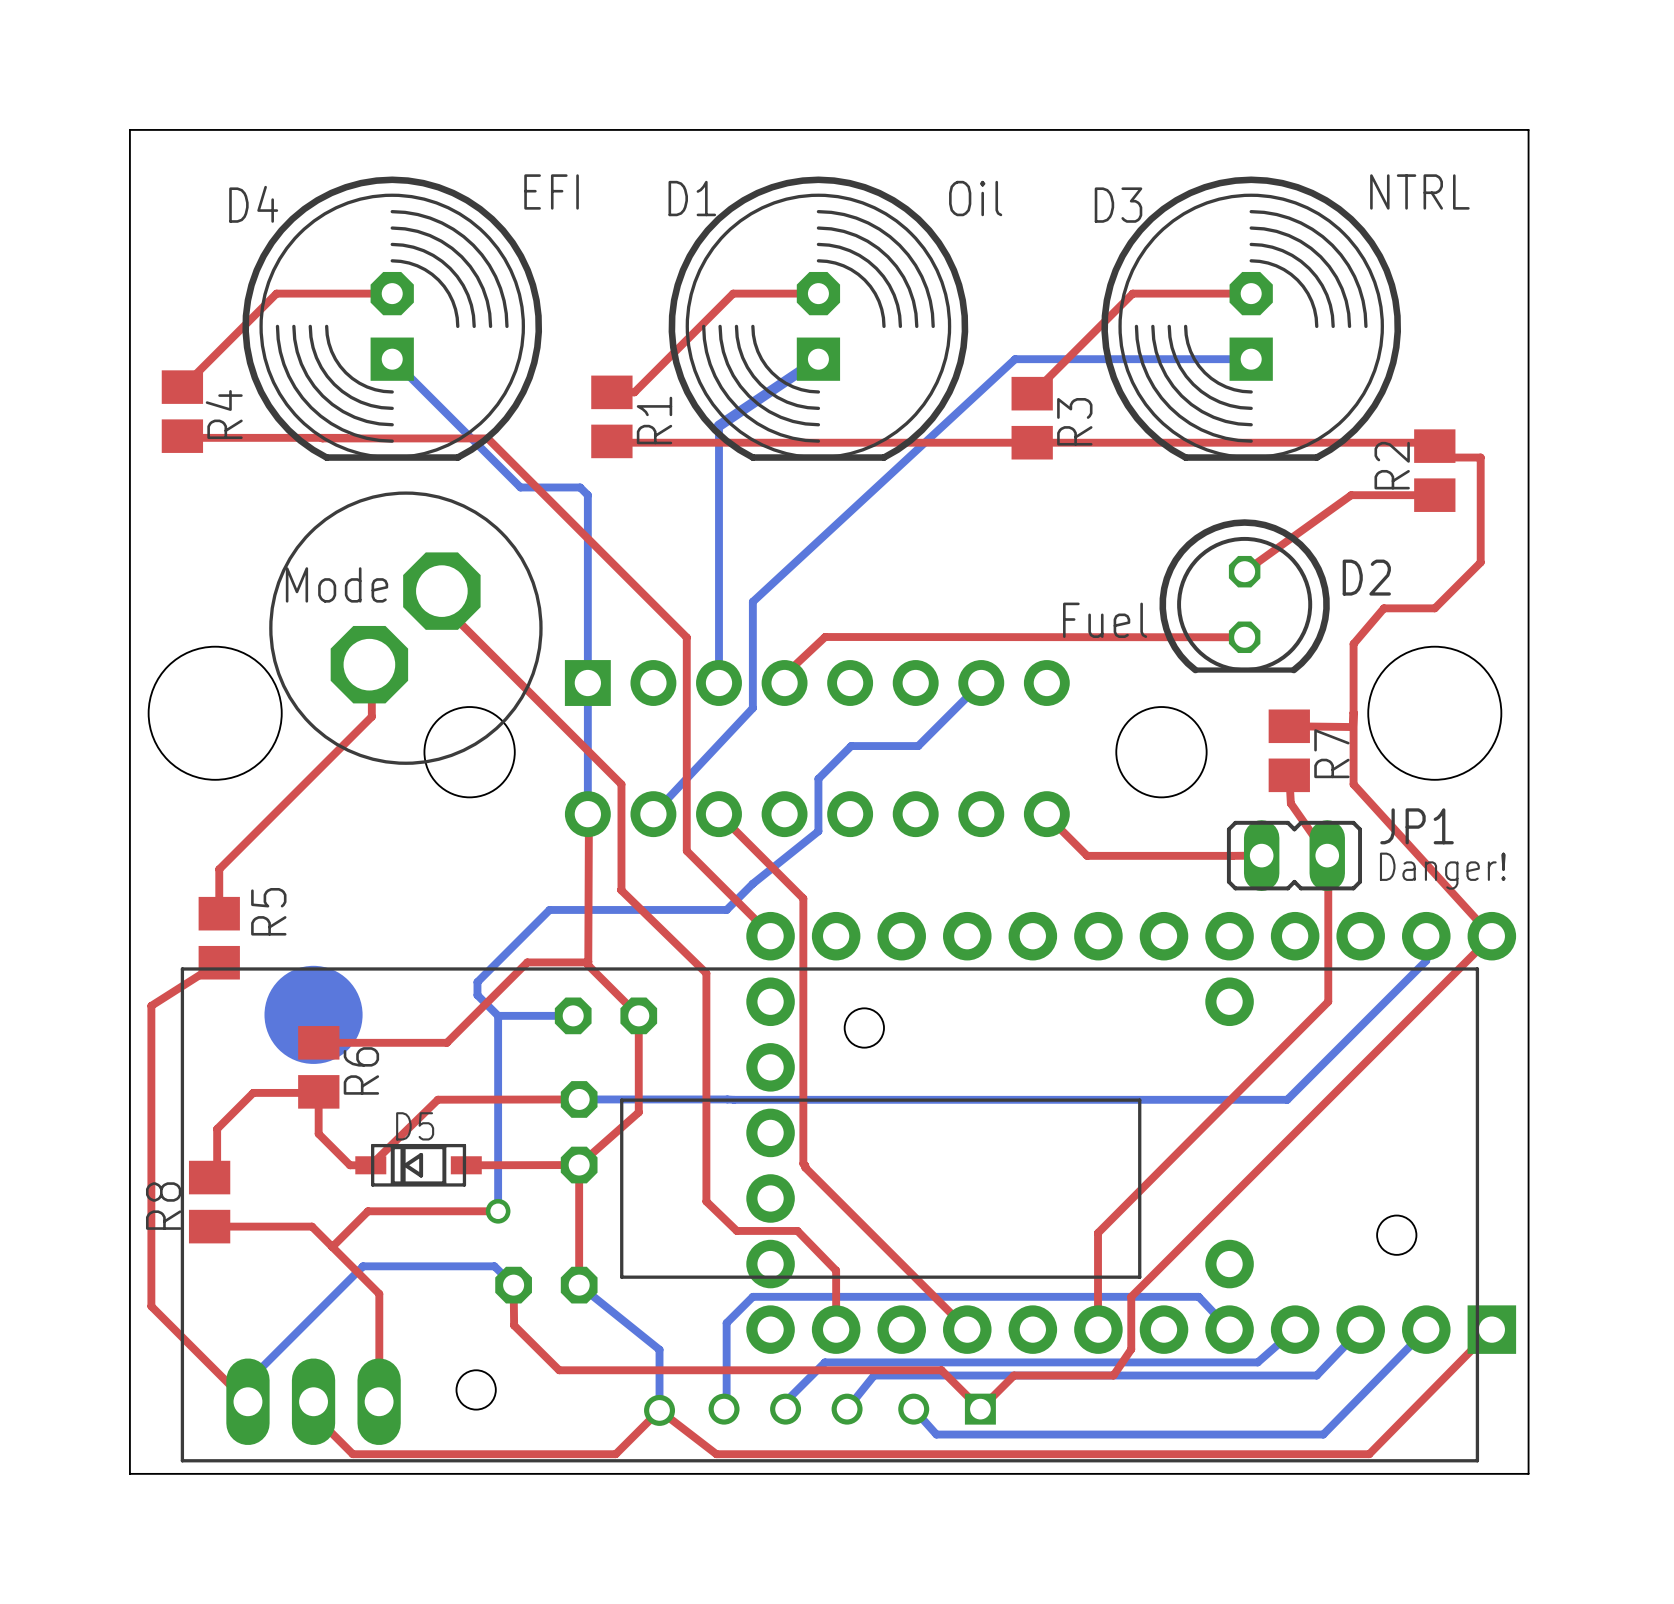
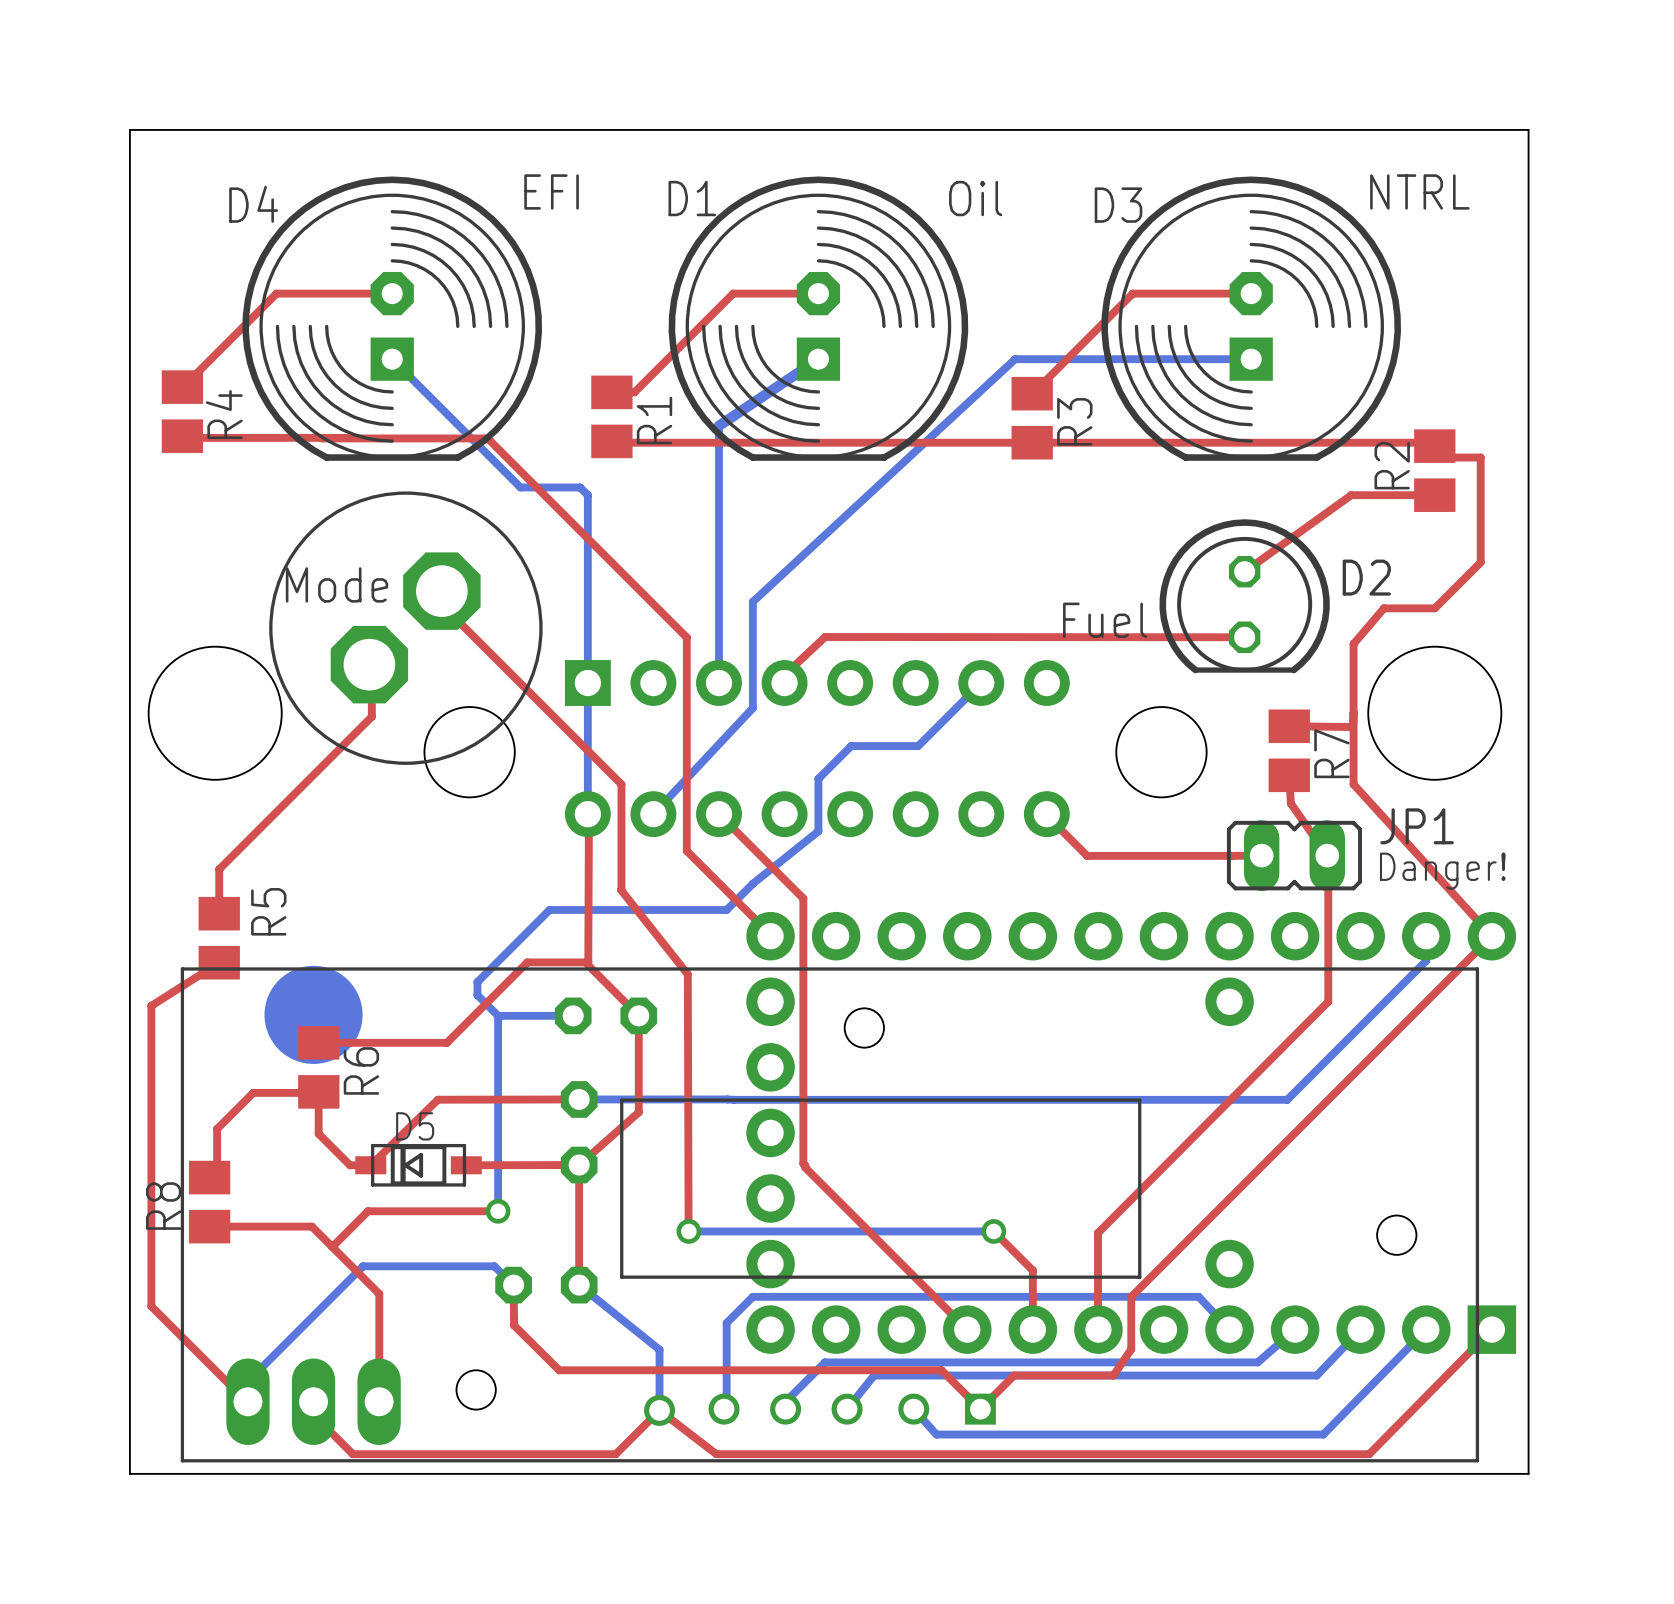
top track: (621, 890) (706, 973) (706, 1201) (736, 1230) (797, 1230) (836, 1270) (836, 1329) -> (621, 890) (687, 974) (688, 1231)
bottom track: none -> (688, 1231) (993, 1231)
via: none -> (688, 1231)
top track: none -> (993, 1231) (1032, 1270) (1032, 1329)
via: none -> (993, 1231)

